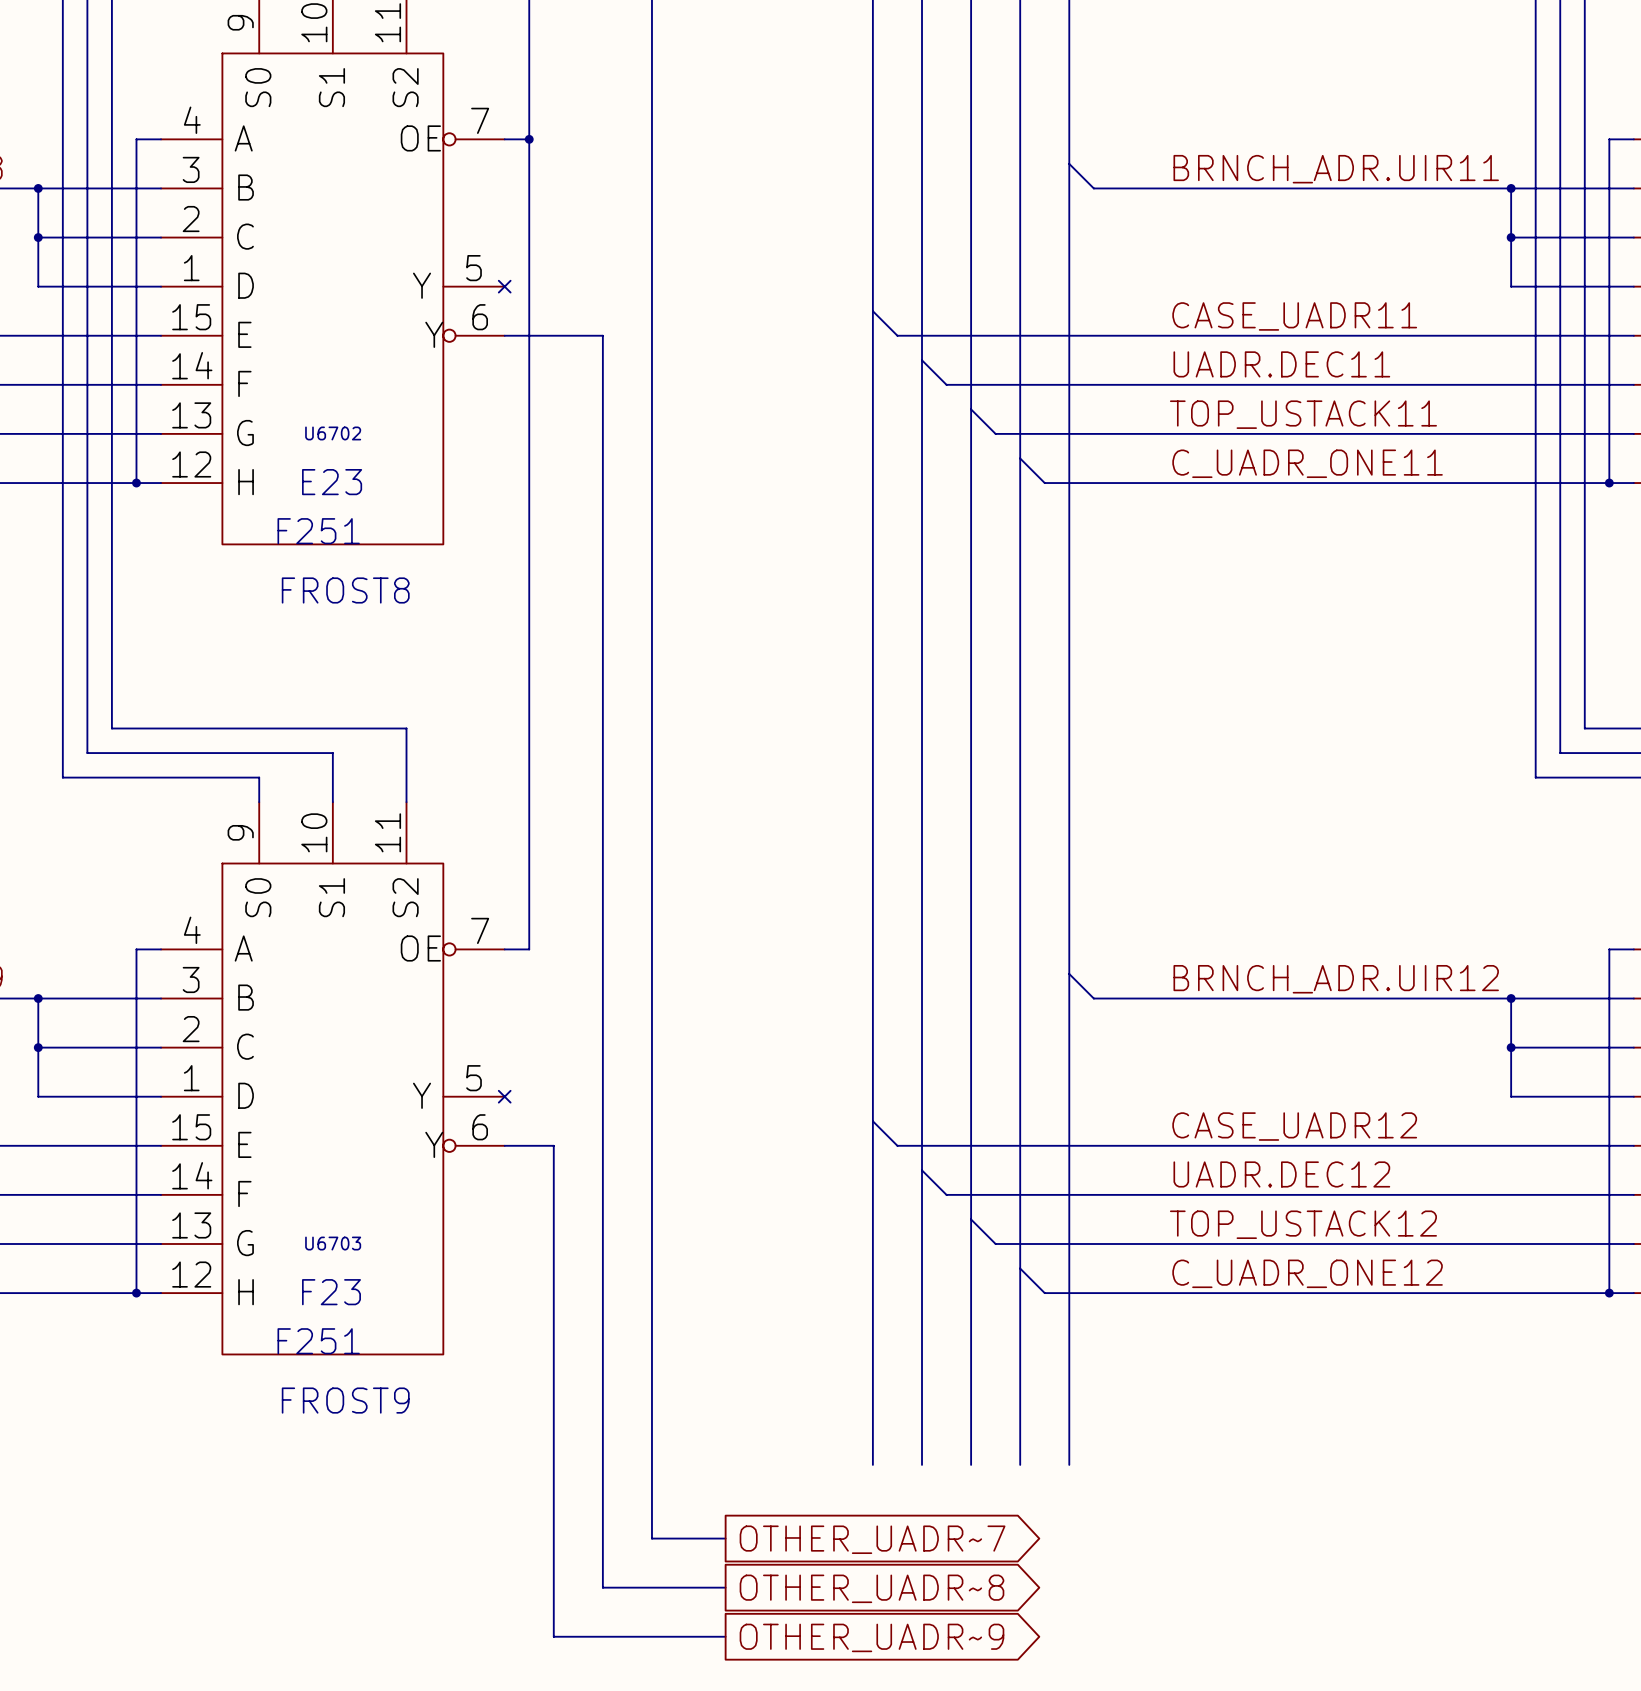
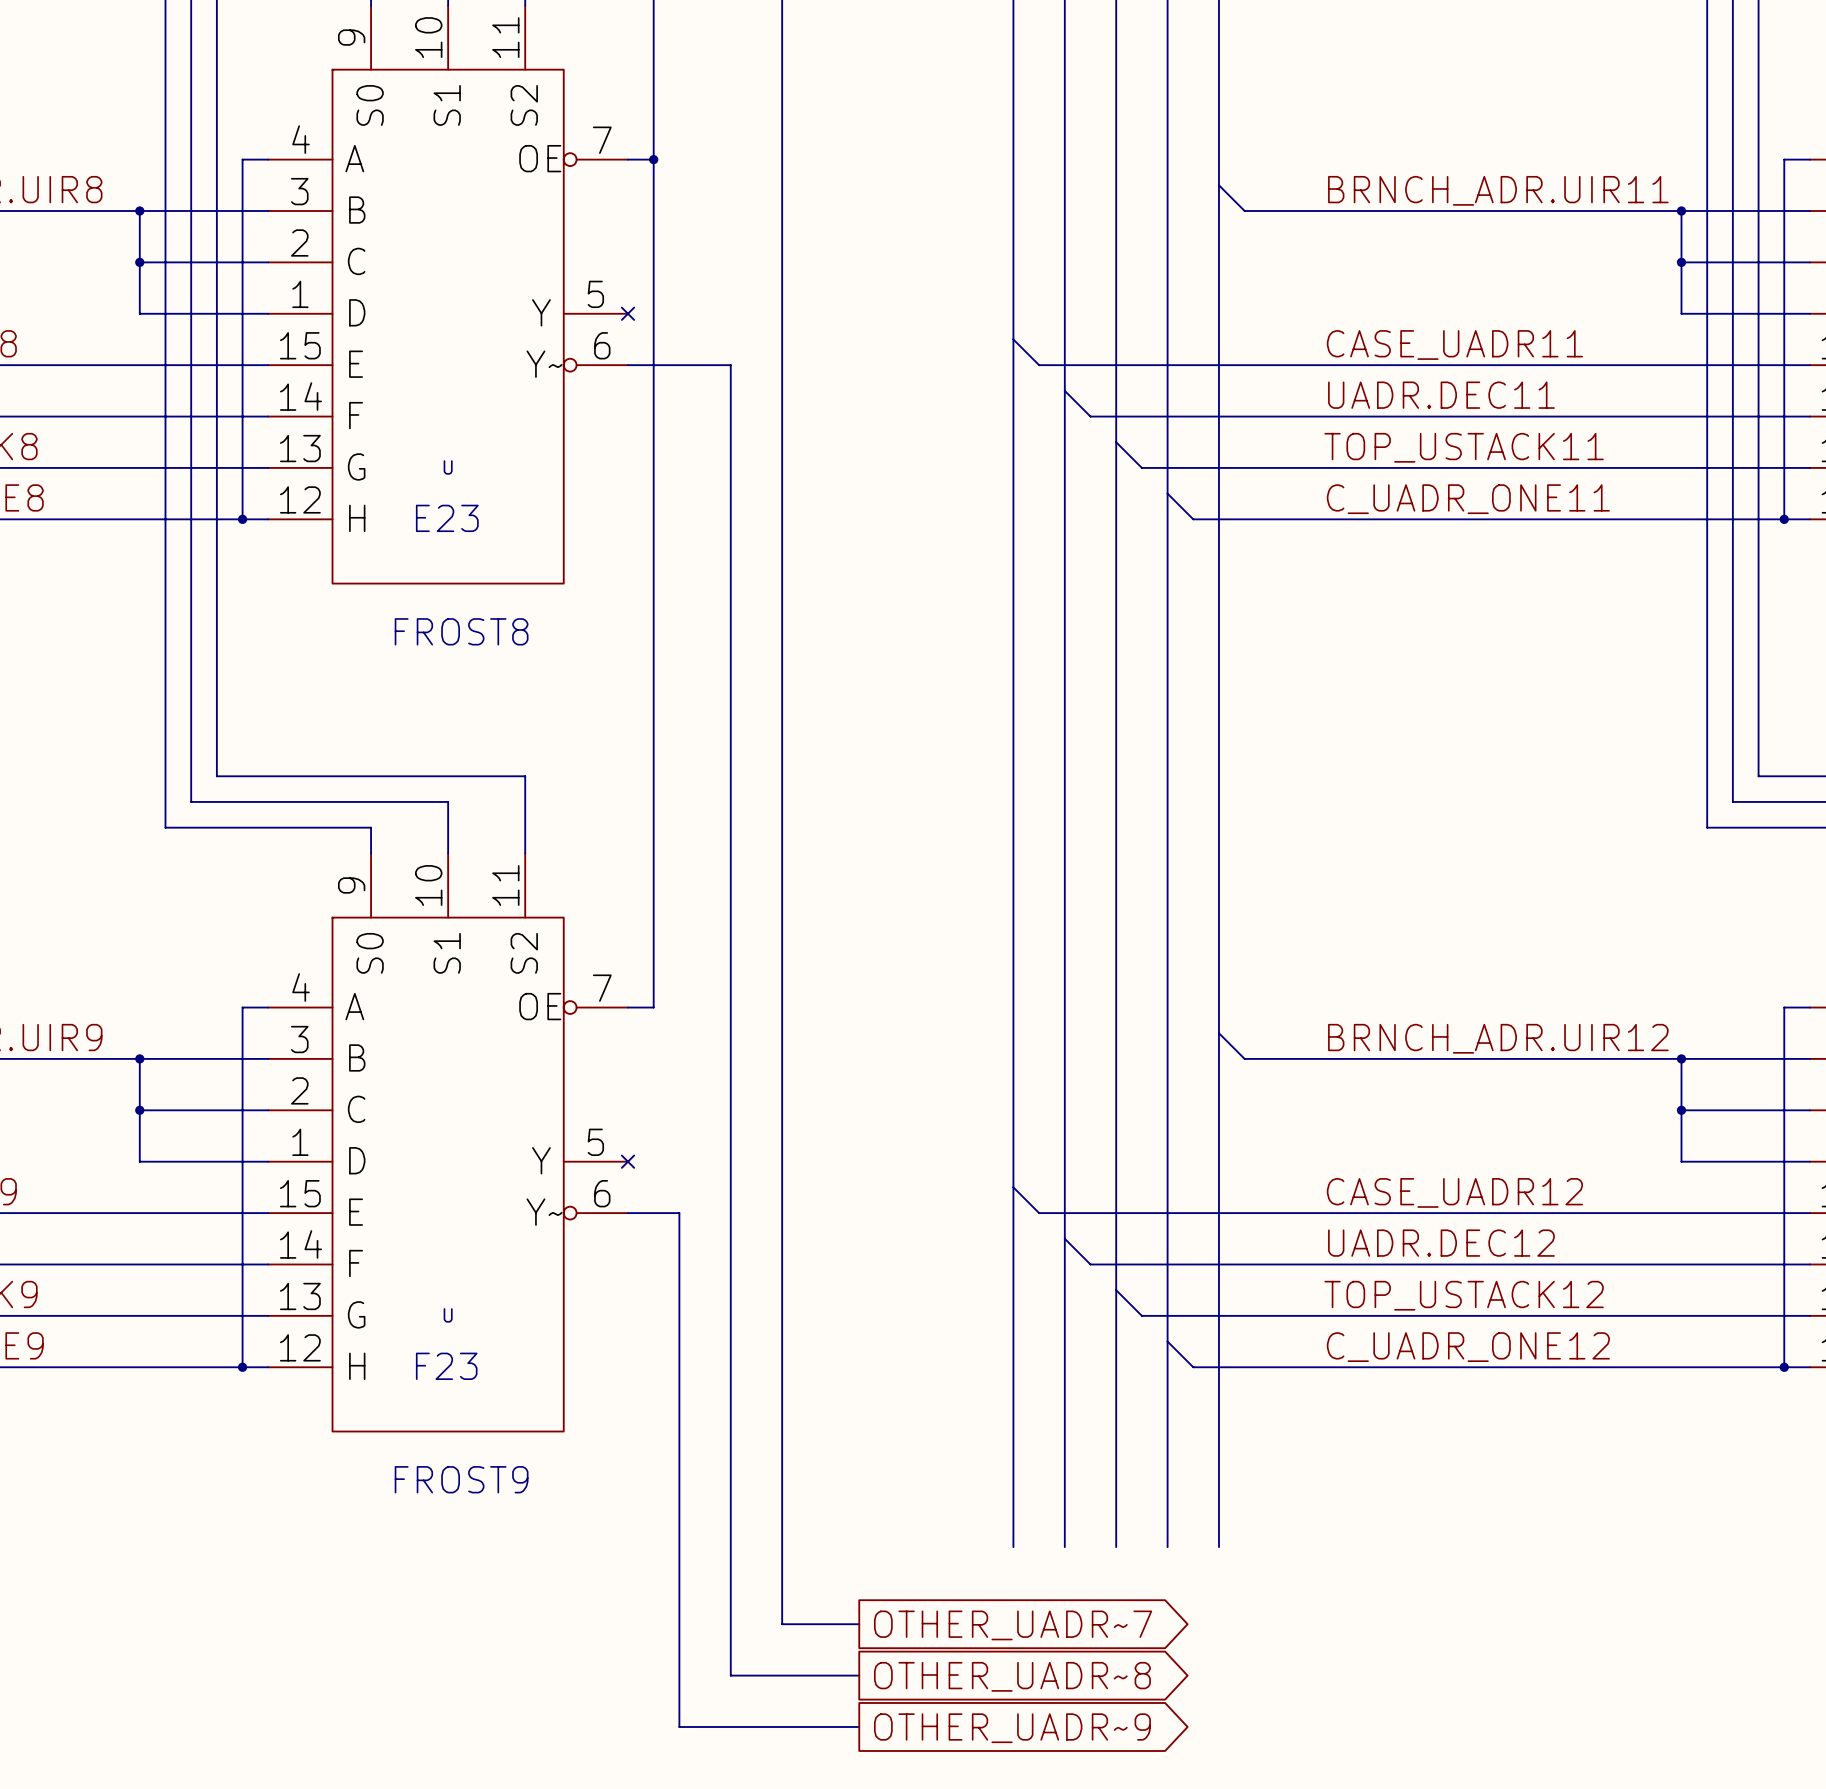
U6702 pin name: Y (434, 334) -> Y~ (544, 364)
U6702 name: U6702 (333, 433) -> U (448, 467)
U6702 value: F251 (318, 531) -> none
U6703 pin name: Y (434, 1144) -> Y~ (544, 1212)
U6703 name: U6703 (333, 1243) -> U (448, 1315)
U6703 value: F251 (318, 1341) -> none

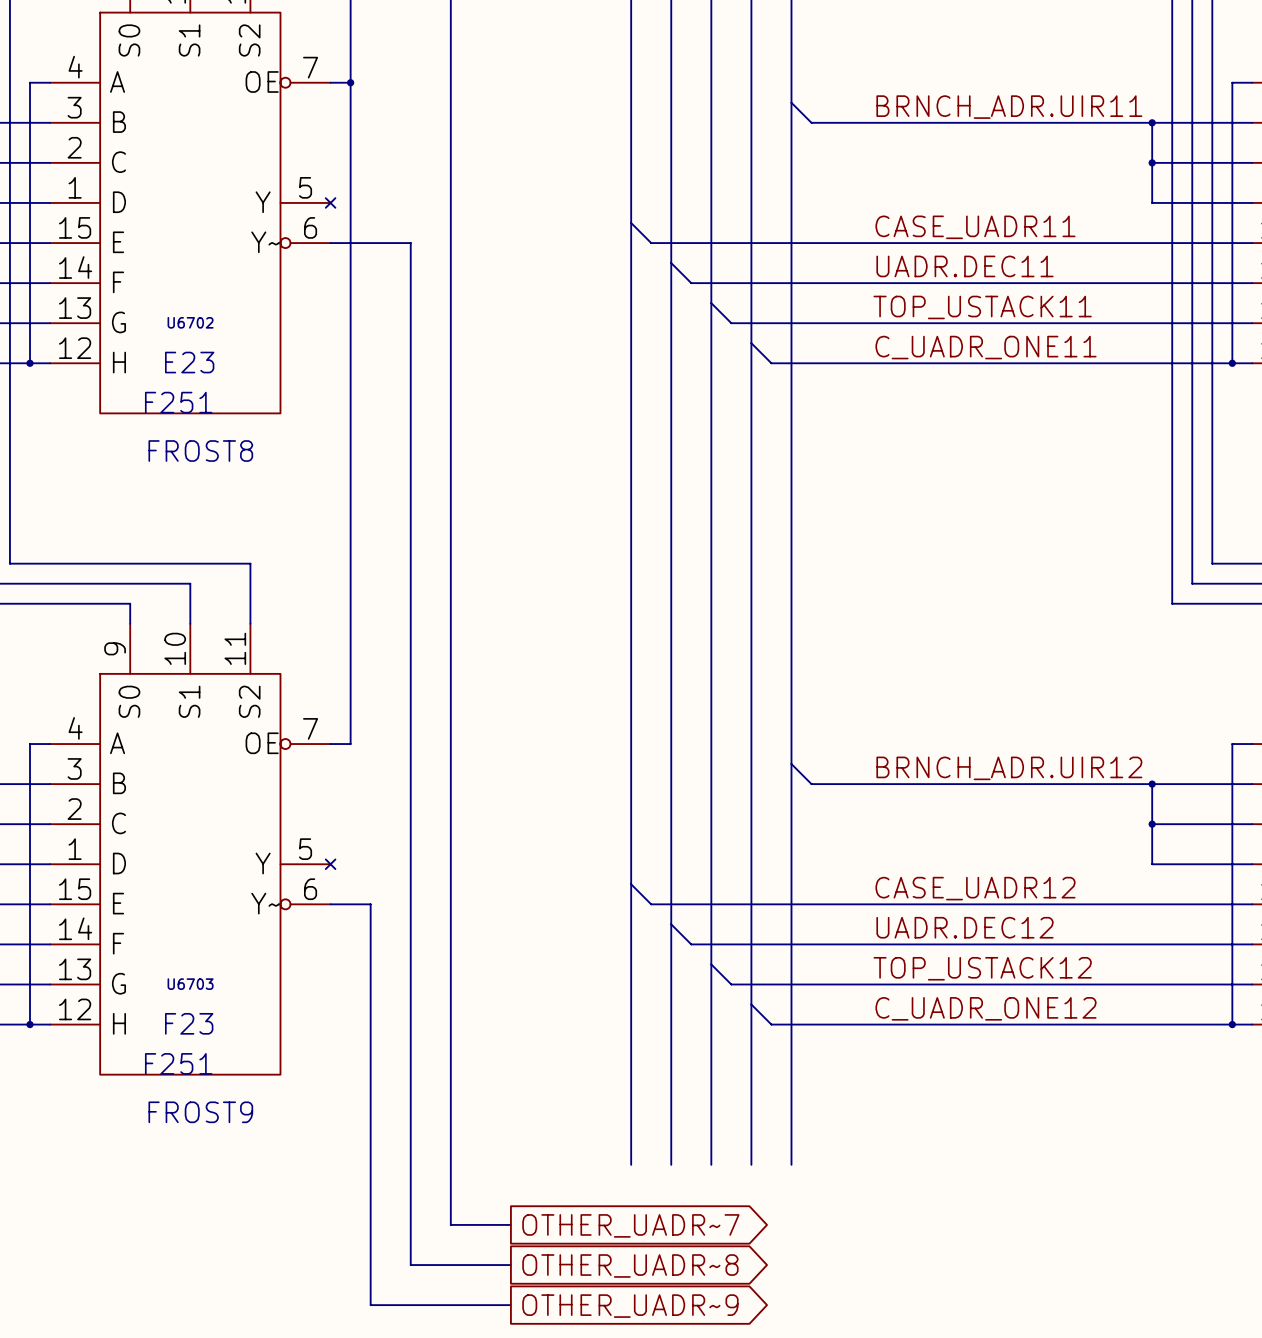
U name: U (448, 467) -> U6702 (190, 322)
U value: none -> F251 (178, 402)
U name: U (448, 1315) -> U6703 (190, 984)
U value: none -> F251 (178, 1063)

